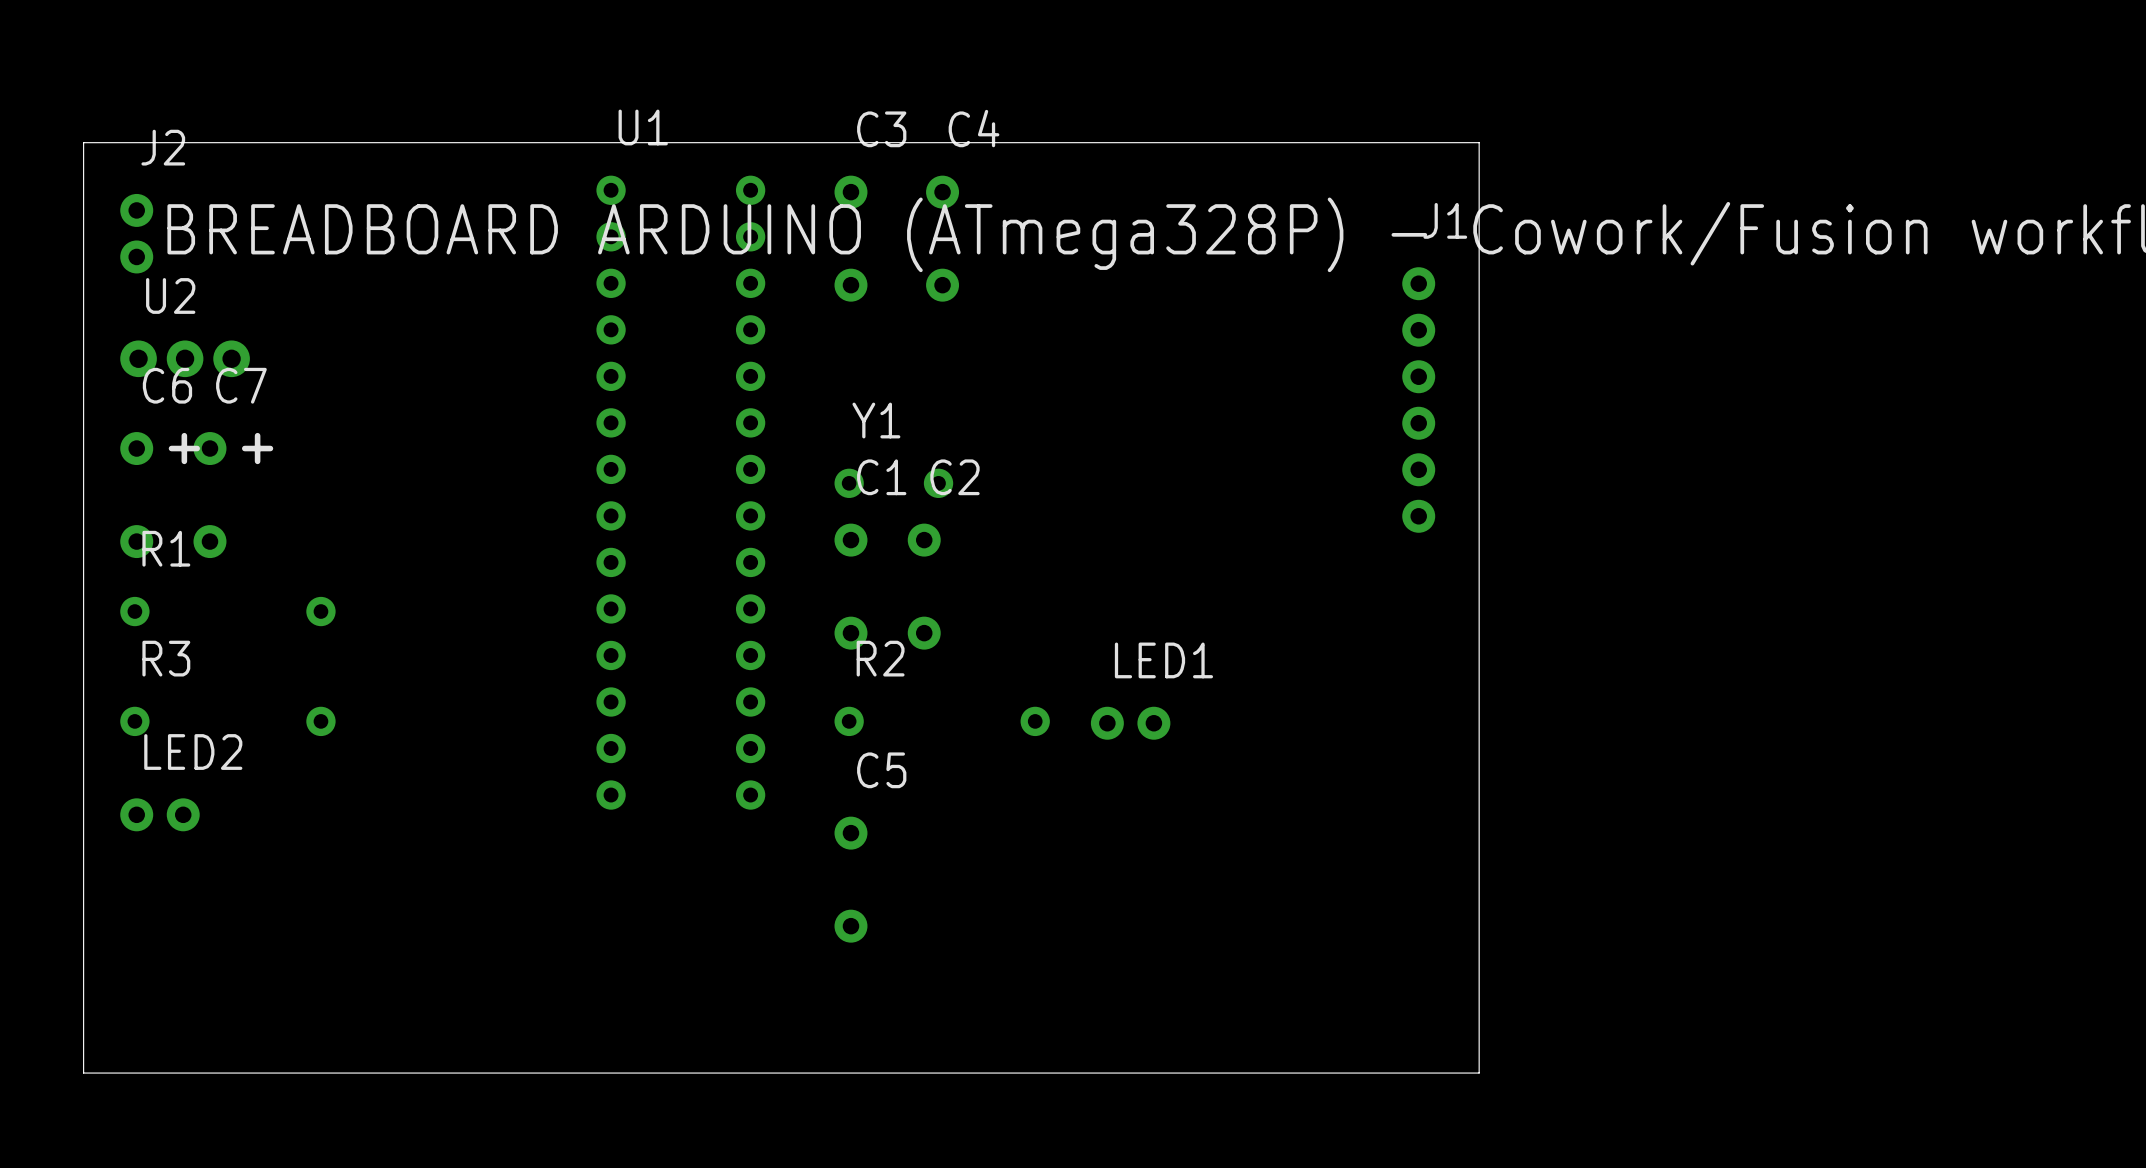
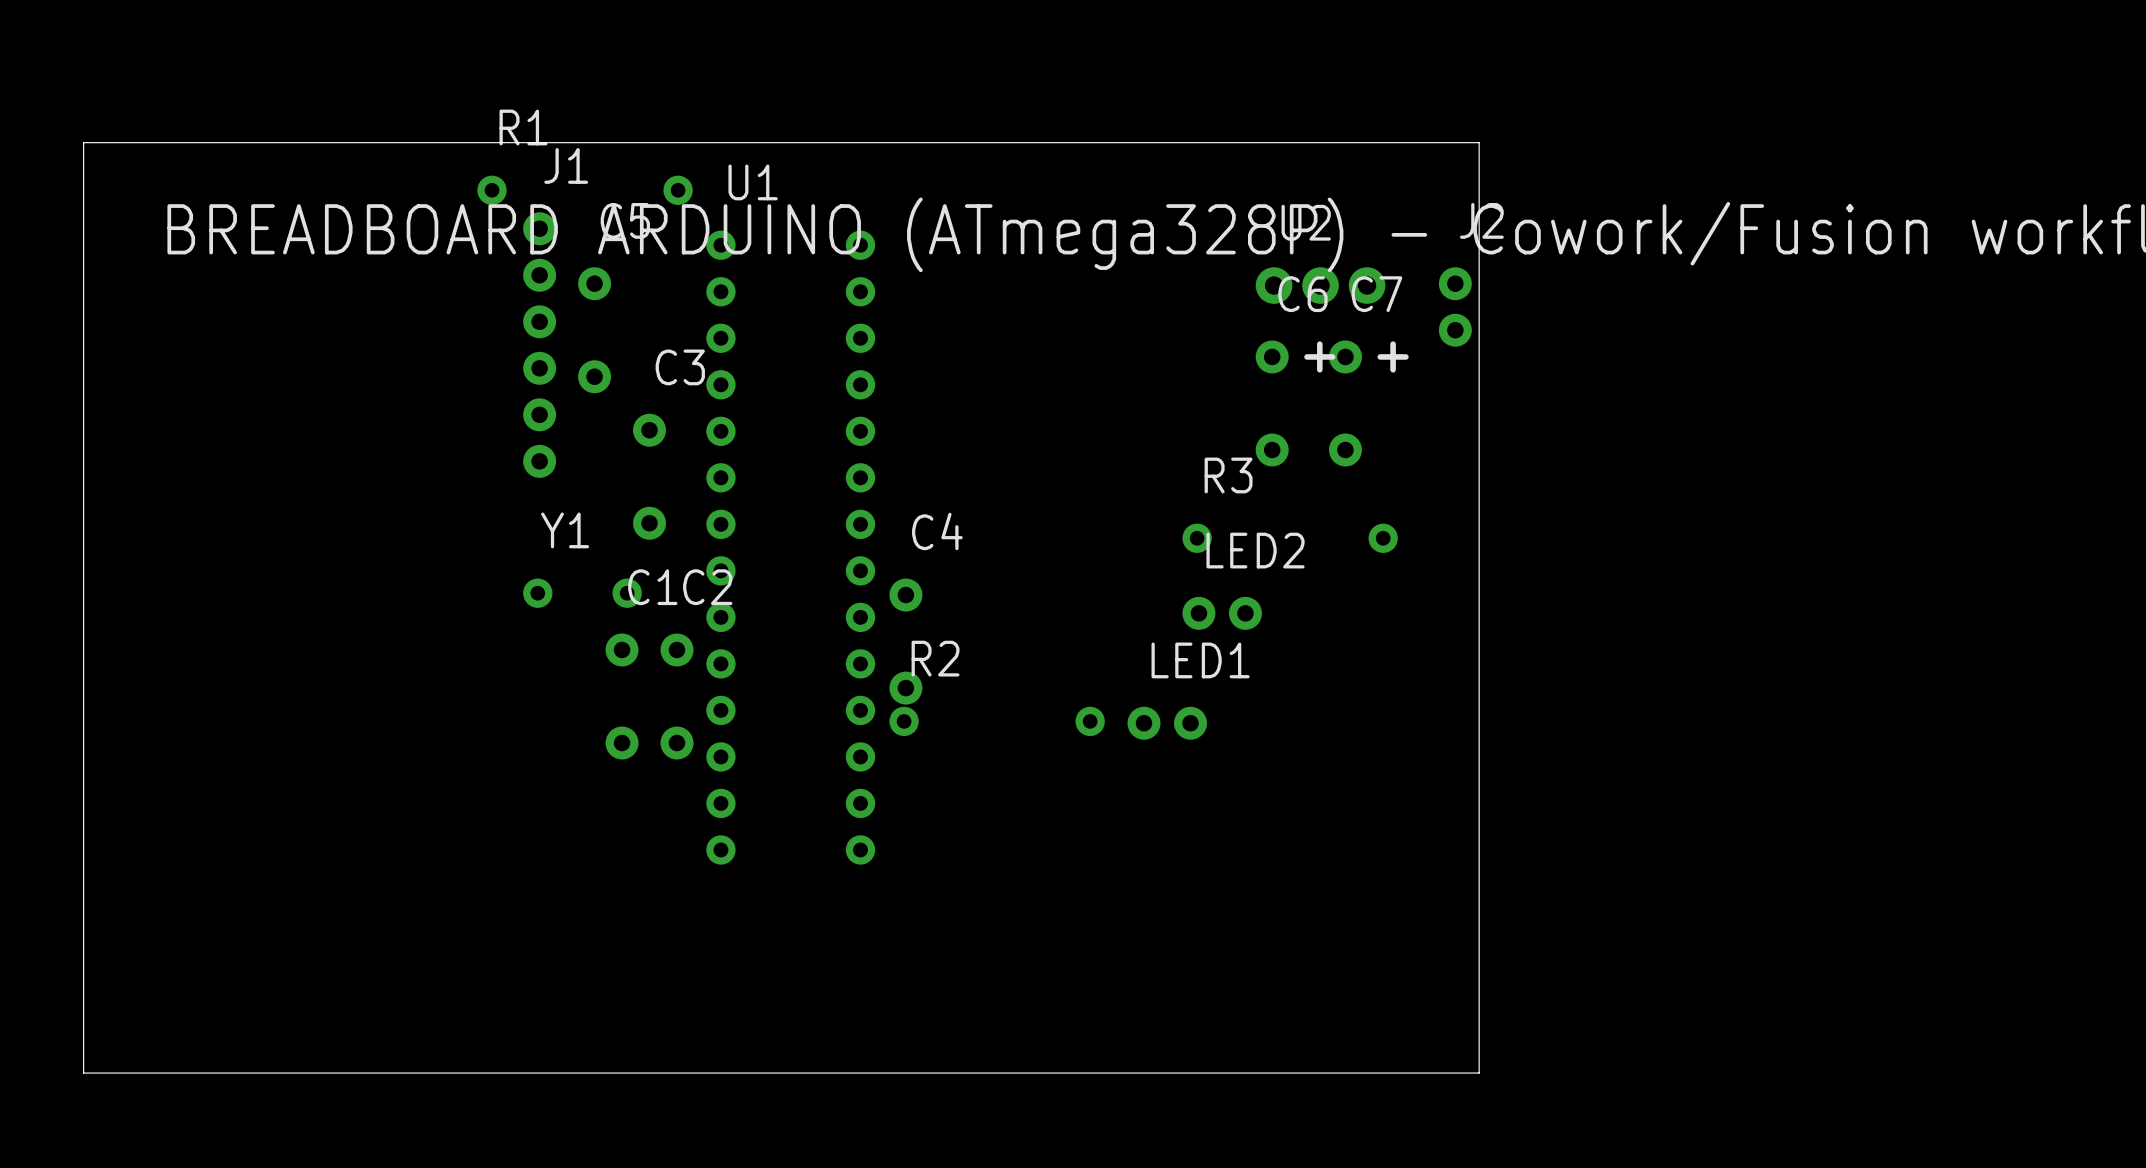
J2 position: (136, 233) -> (1455, 306)
C3 position: (850, 238) -> (649, 476)
C4 position: (942, 238) -> (905, 641)
U2 position: (185, 358) -> (1320, 285)
J1 position: (1418, 399) -> (539, 345)
Y1 position: (893, 483) -> (582, 593)
U1 position: (680, 492) -> (790, 547)
C6 position: (160, 495) -> (1295, 403)
C7 position: (233, 495) -> (1368, 403)
C1 position: (850, 586) -> (622, 696)
C2 position: (924, 586) -> (676, 696)
R1 position: (227, 611) -> (585, 190)
R3 position: (227, 721) -> (1290, 538)
R2 position: (942, 721) -> (997, 721)
LED1 position: (1130, 723) -> (1167, 723)
LED2 position: (159, 814) -> (1222, 613)
C5 position: (850, 879) -> (594, 330)

